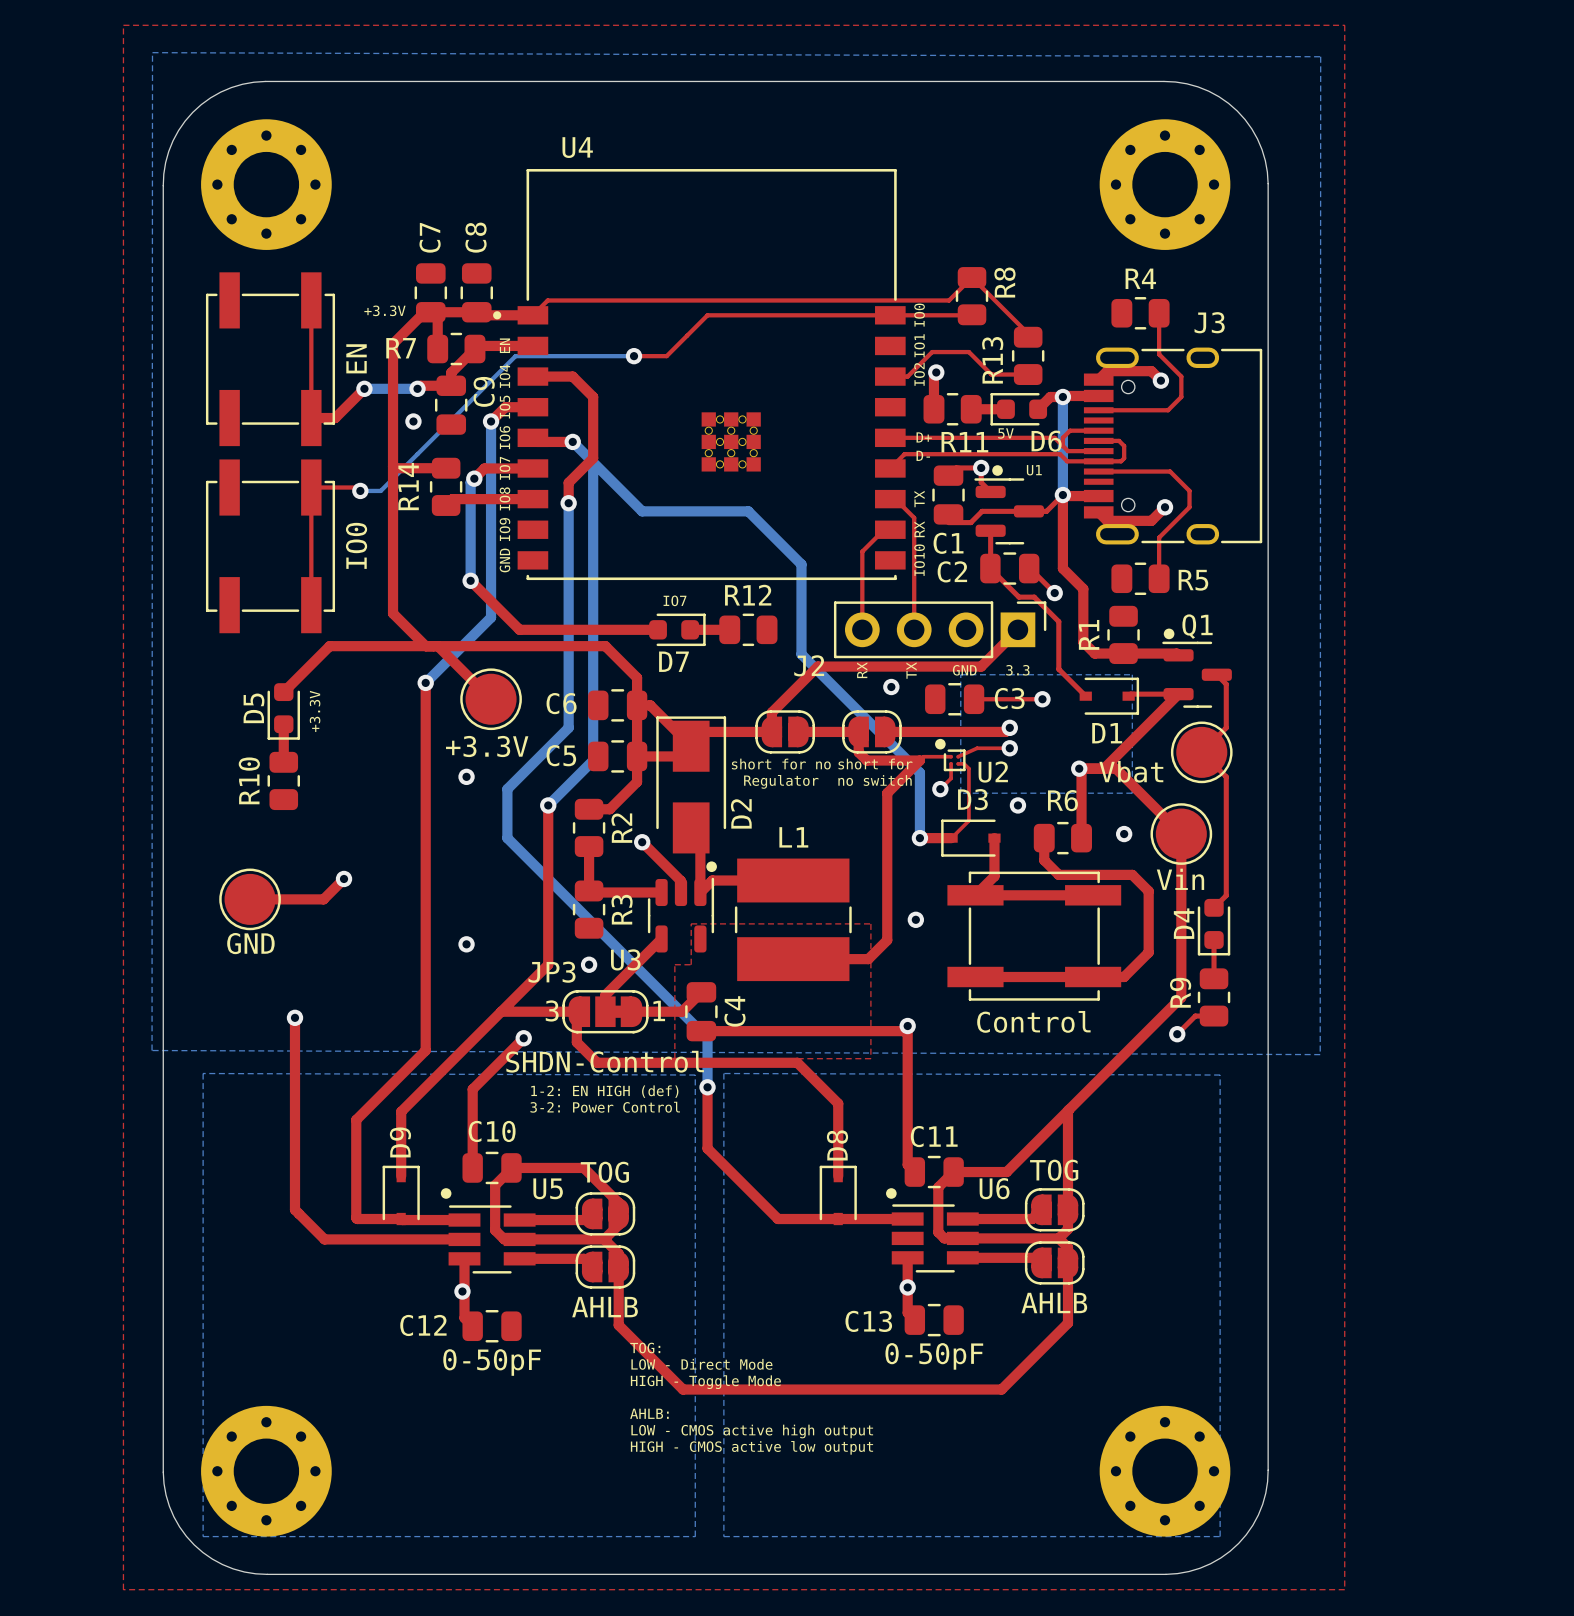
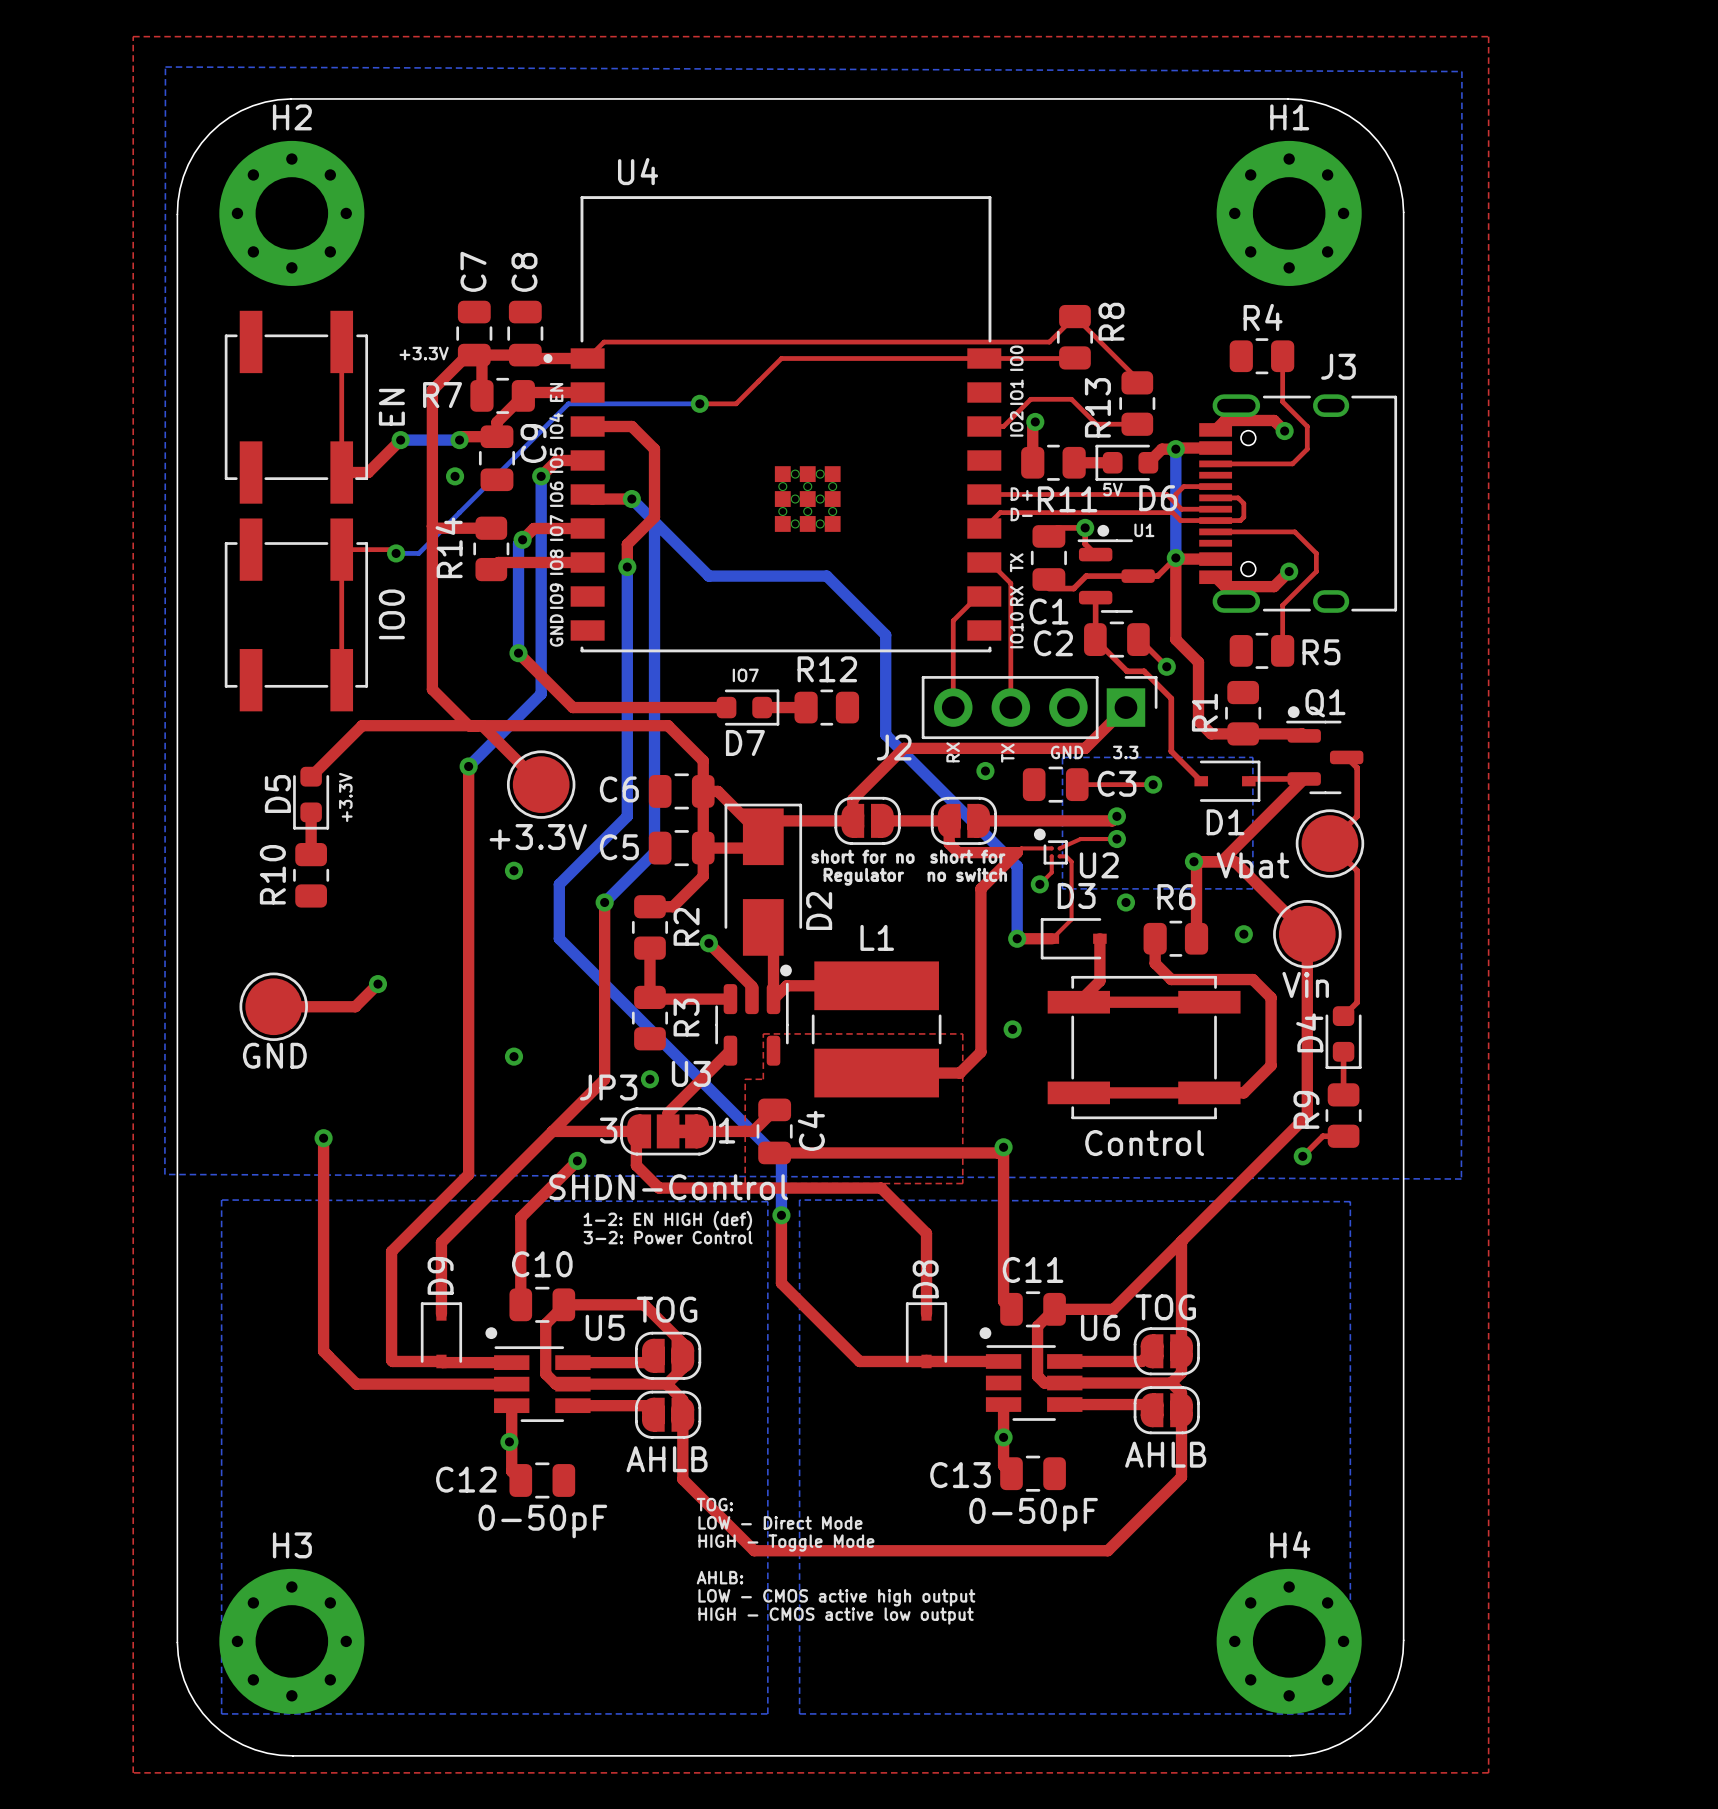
H2 name: none -> H2 (292, 117)
H1 name: none -> H1 (1289, 117)
H3 name: none -> H3 (292, 1545)
H4 name: none -> H4 (1290, 1544)

